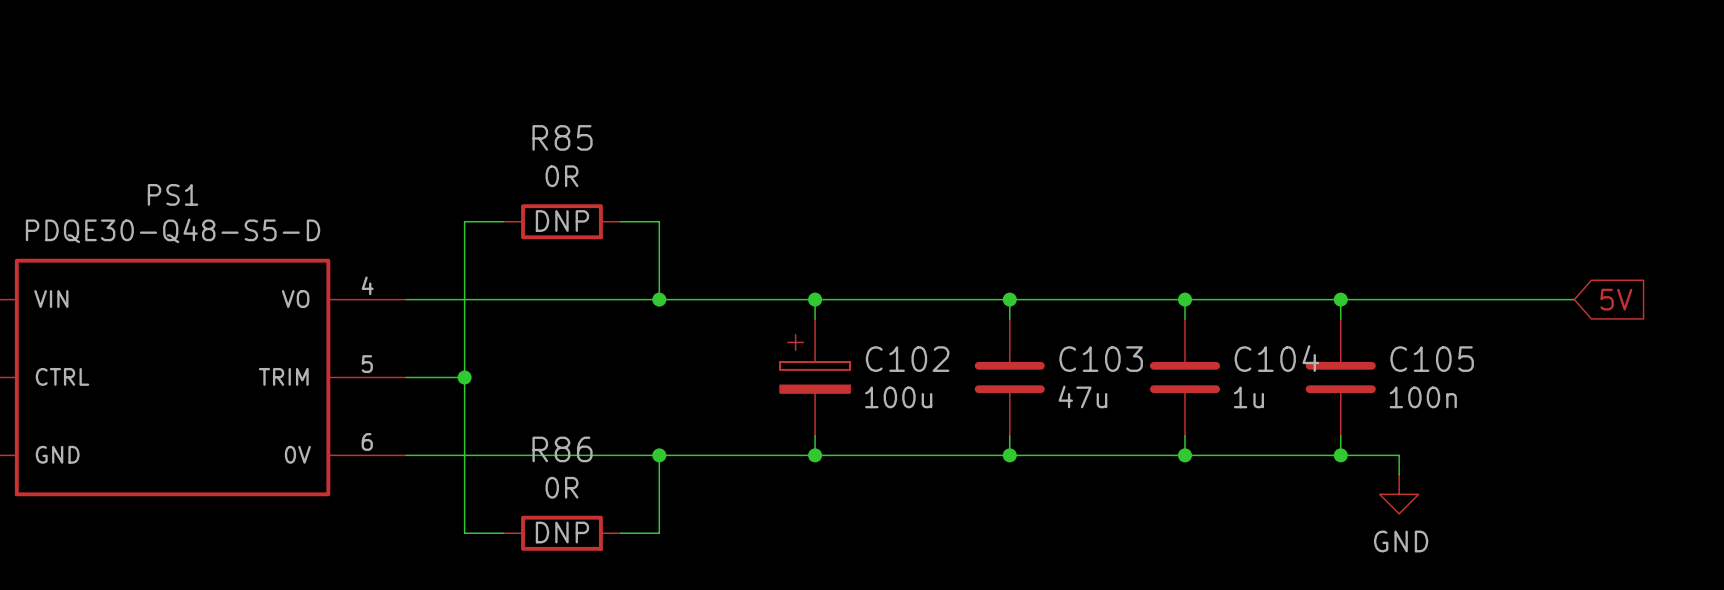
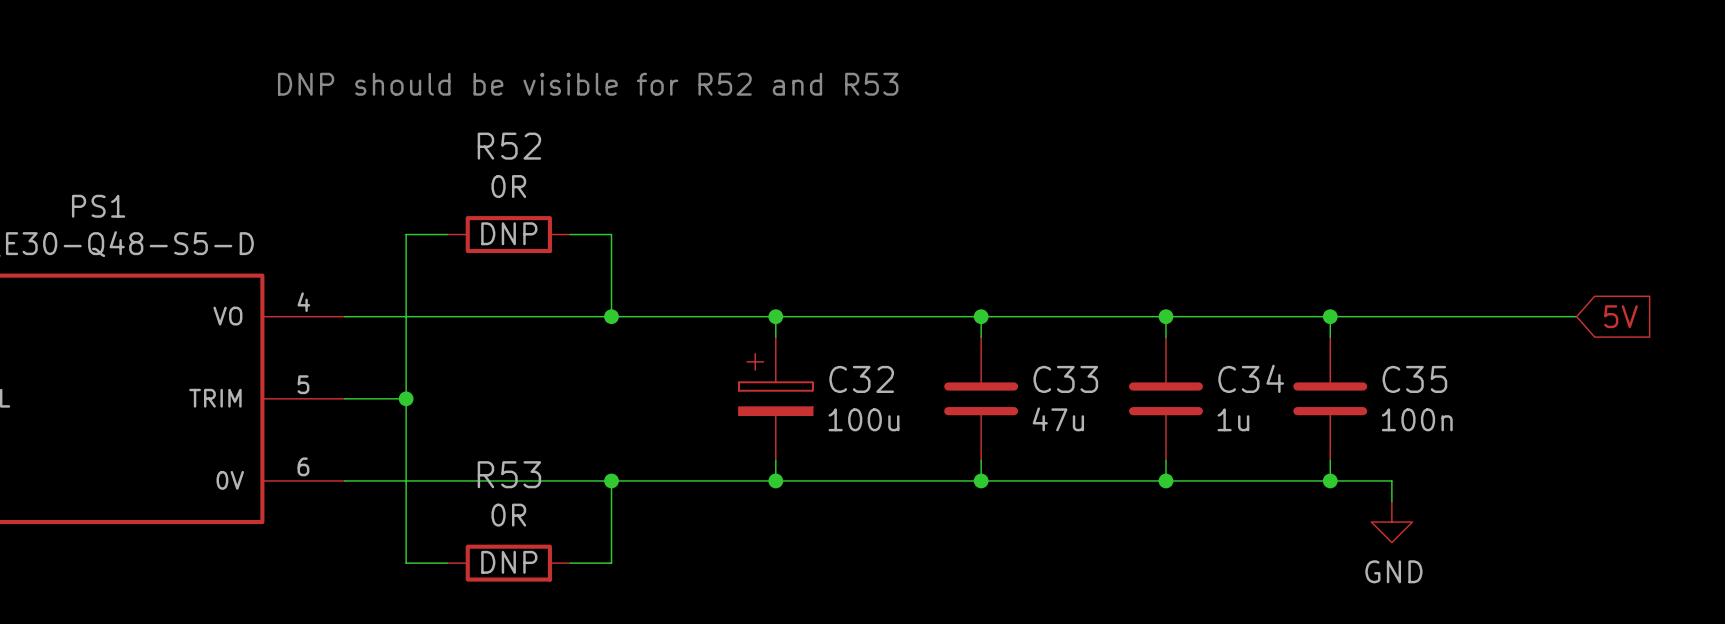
text: none -> DNP should be visible for R52 and R53 (588, 84)
R85 name: R85 (562, 137) -> R52 (509, 146)
C104 name: C104 (1276, 358) -> C34 (1251, 378)
C102 name: C102 (907, 359) -> C32 (861, 379)
C103 name: C103 (1101, 359) -> C33 (1065, 379)
C105 name: C105 (1432, 359) -> C35 (1414, 379)
R86 name: R86 (562, 449) -> R53 (509, 474)

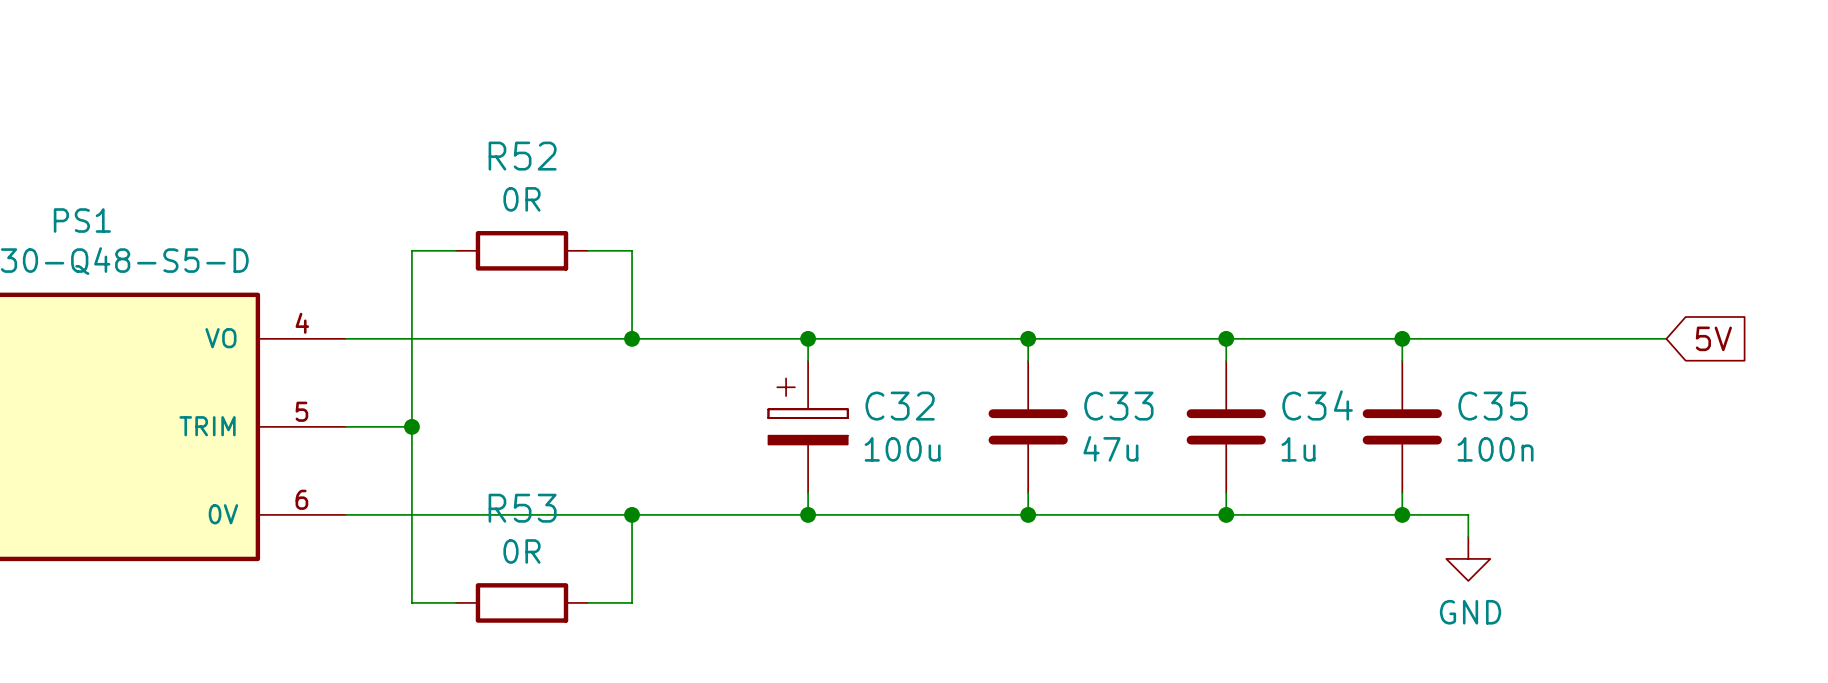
text: DNP should be visible for R52 and R53 (588, 84) -> none
R52 text: DNP (509, 233) -> none
R53 text: DNP (509, 562) -> none

